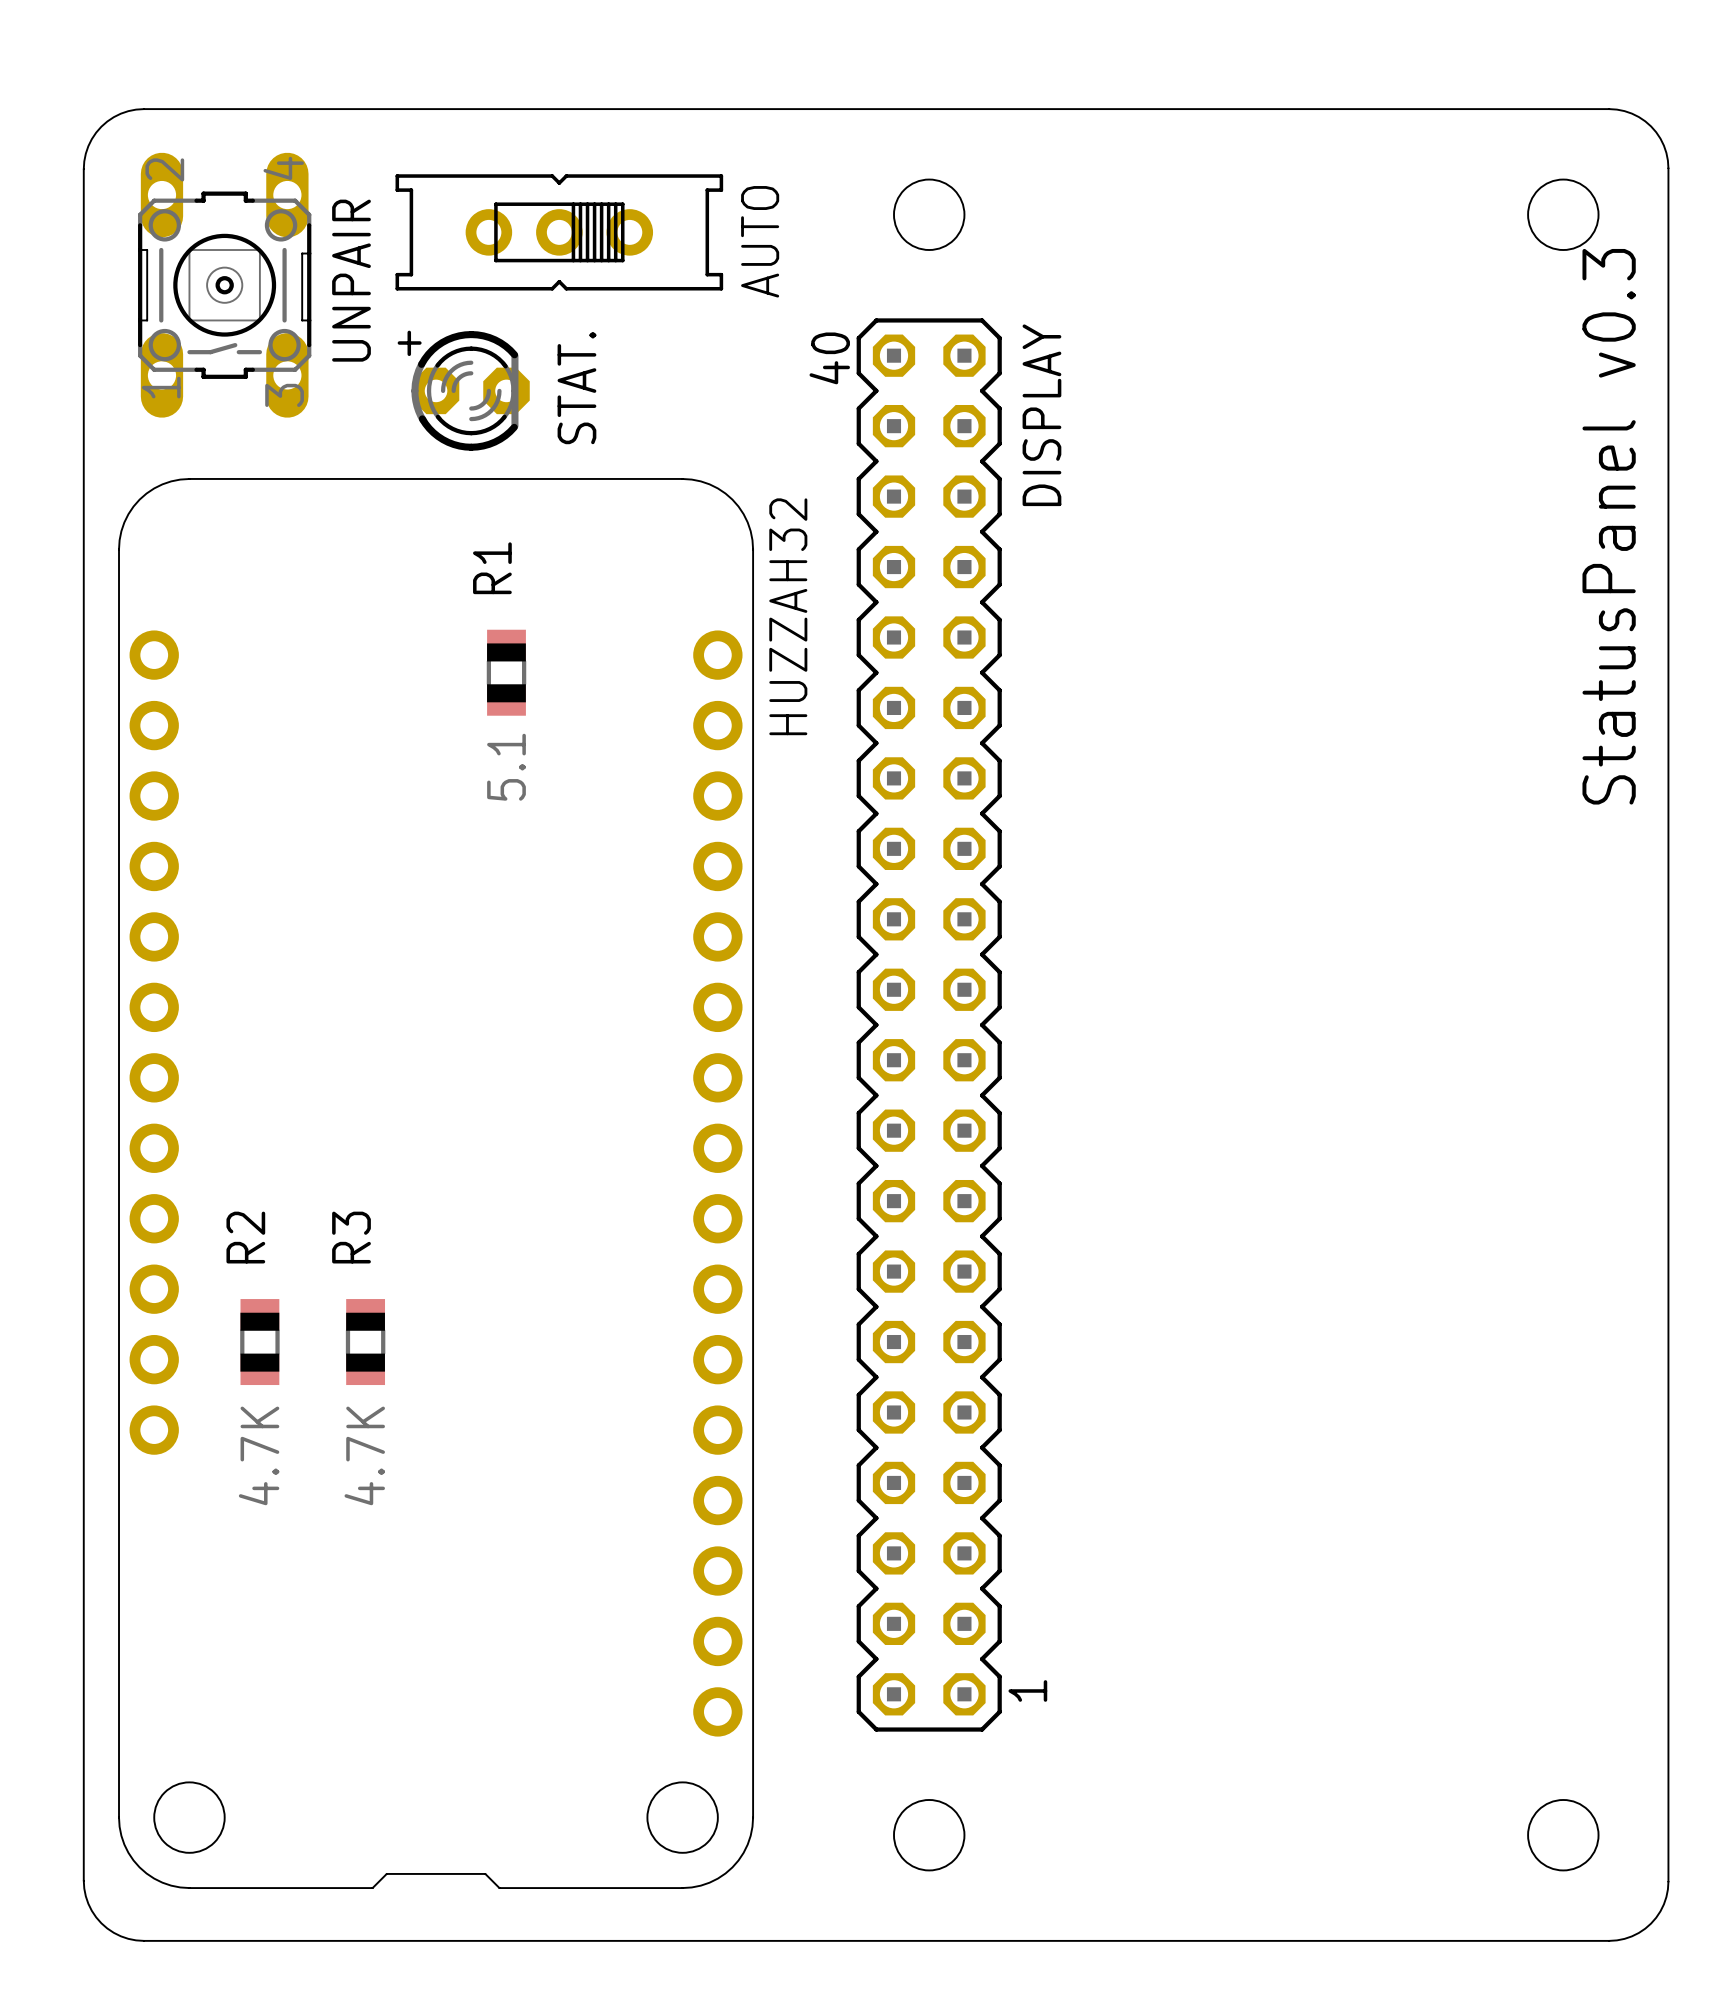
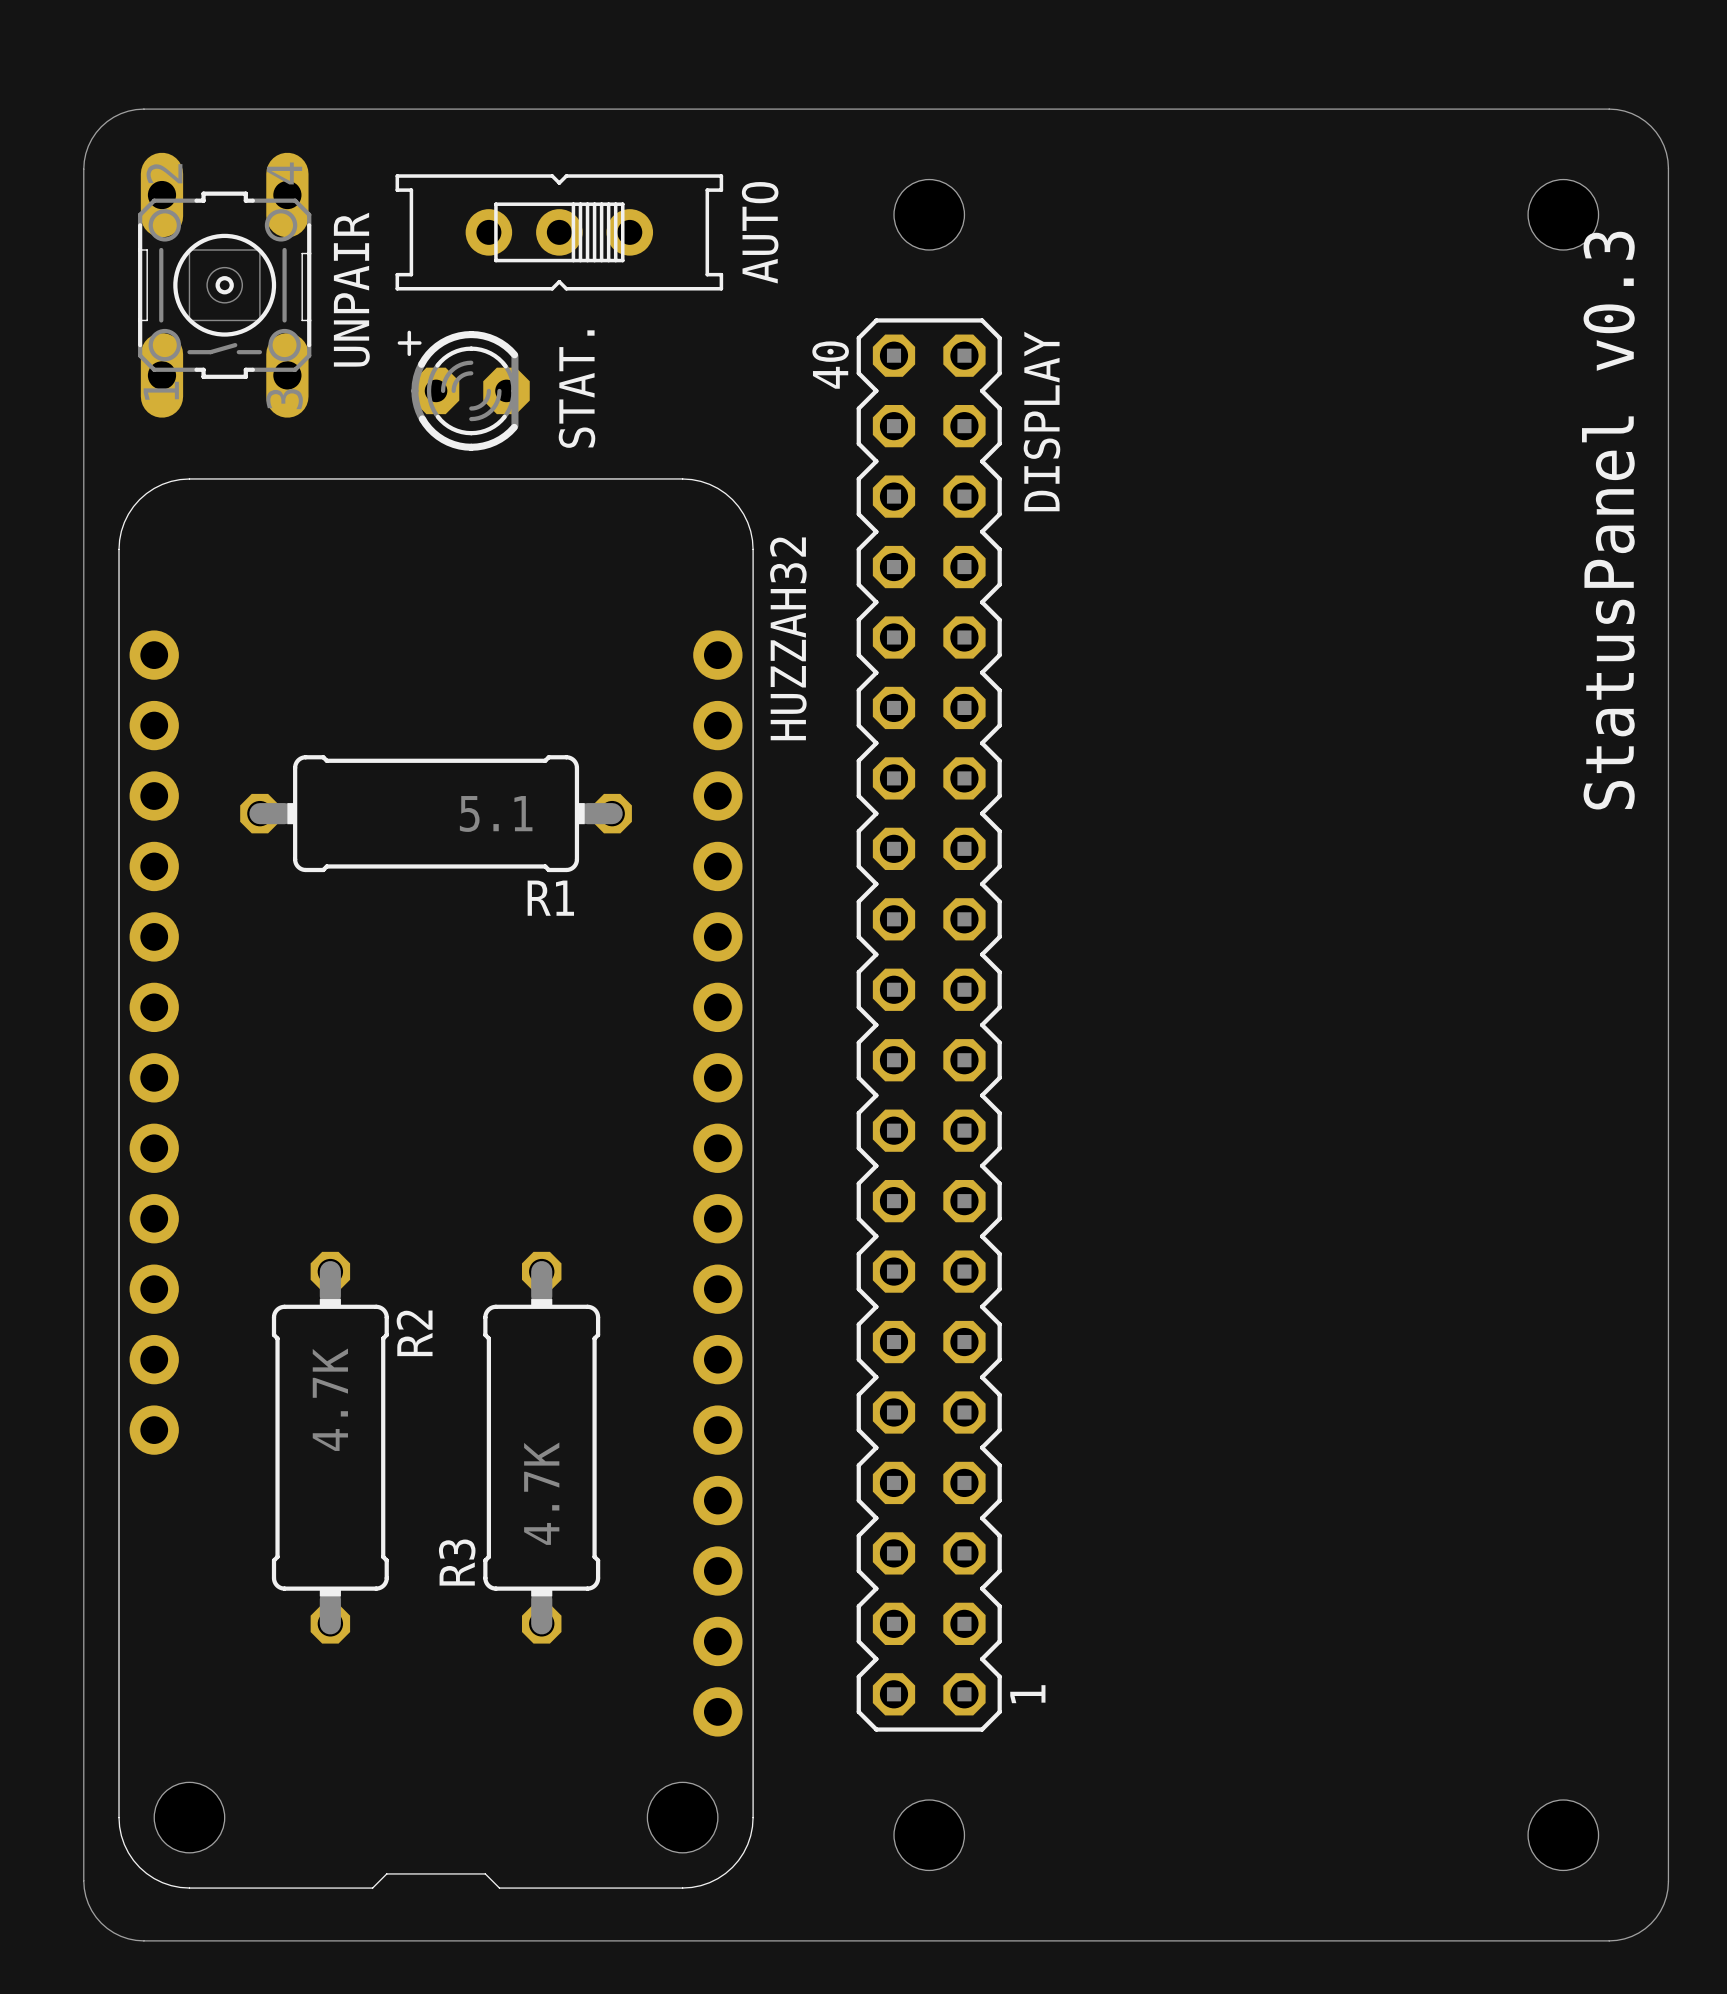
R1 name position: R1 (492, 568) -> R1 (550, 898)
R1 footprint: [486, 629, 527, 716] -> [240, 755, 632, 873]
R1 value position: 5.1 (506, 767) -> 5.1 (496, 813)
R2 name position: R2 (245, 1237) -> R2 (414, 1333)
R3 name position: R3 (351, 1237) -> R3 (457, 1562)
R2 footprint: [240, 1299, 280, 1386] -> [271, 1251, 389, 1644]
R3 footprint: [345, 1299, 386, 1386] -> [483, 1251, 601, 1644]
R2 value position: 4.7K (259, 1455) -> 4.7K (330, 1399)
R3 value position: 4.7K (364, 1455) -> 4.7K (541, 1493)

